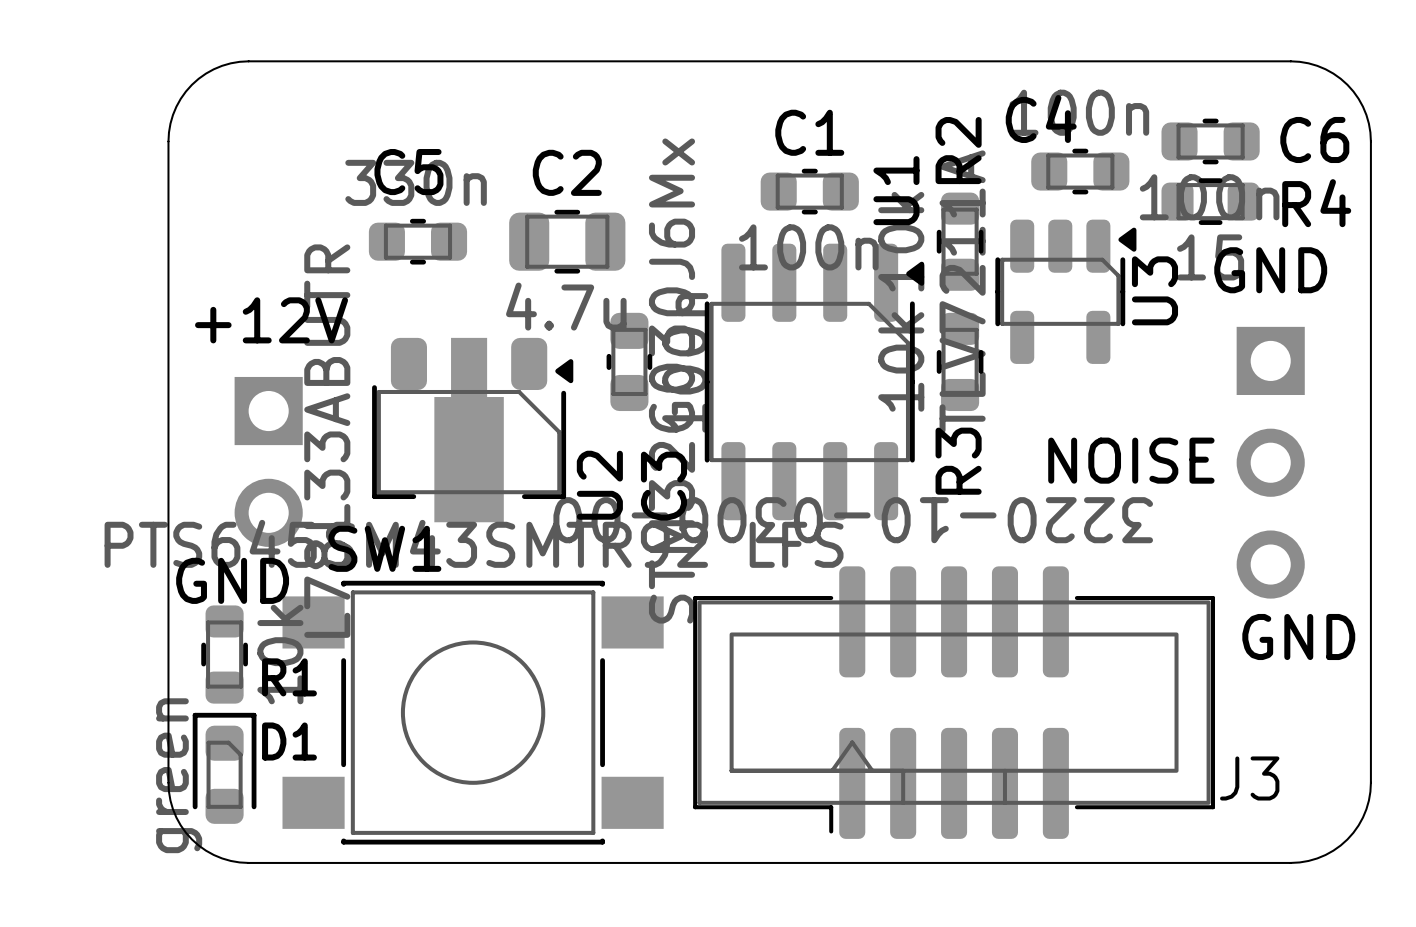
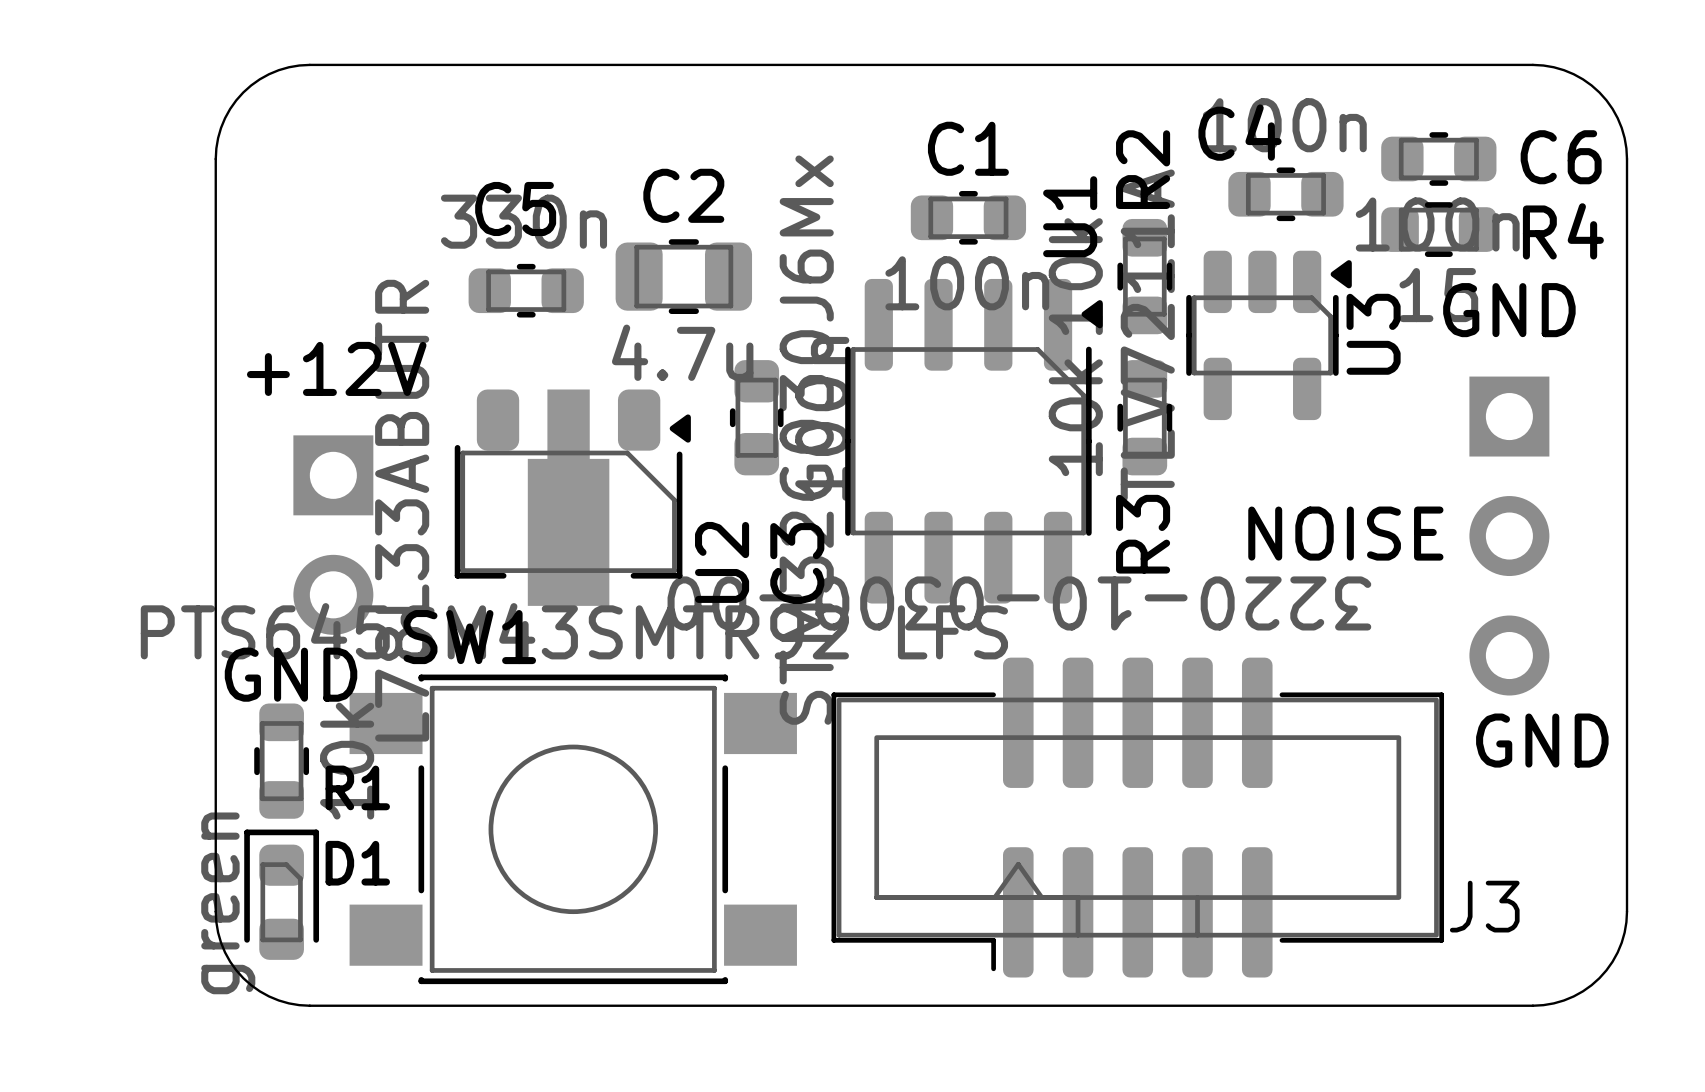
C5 position: (417, 241) -> (526, 290)

